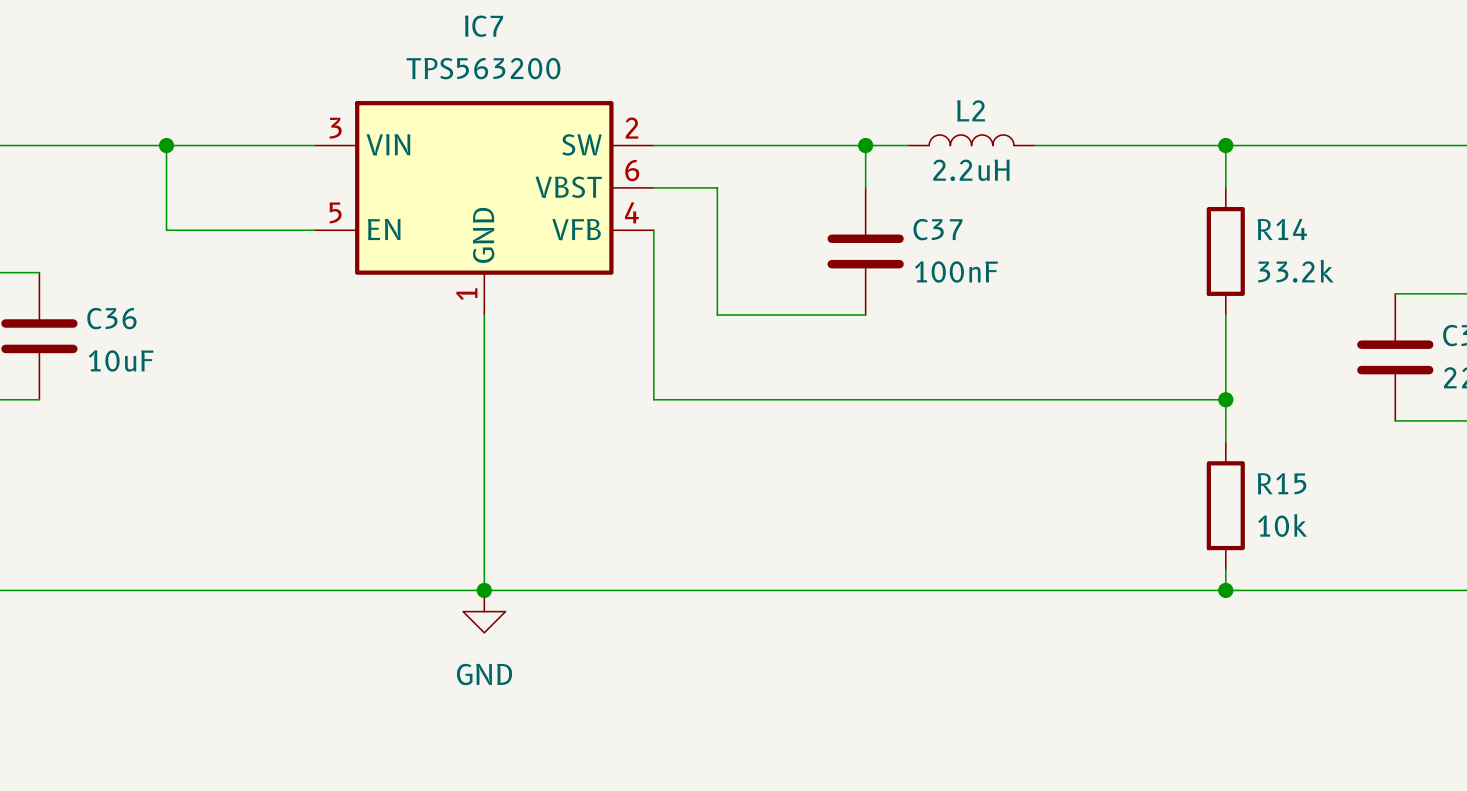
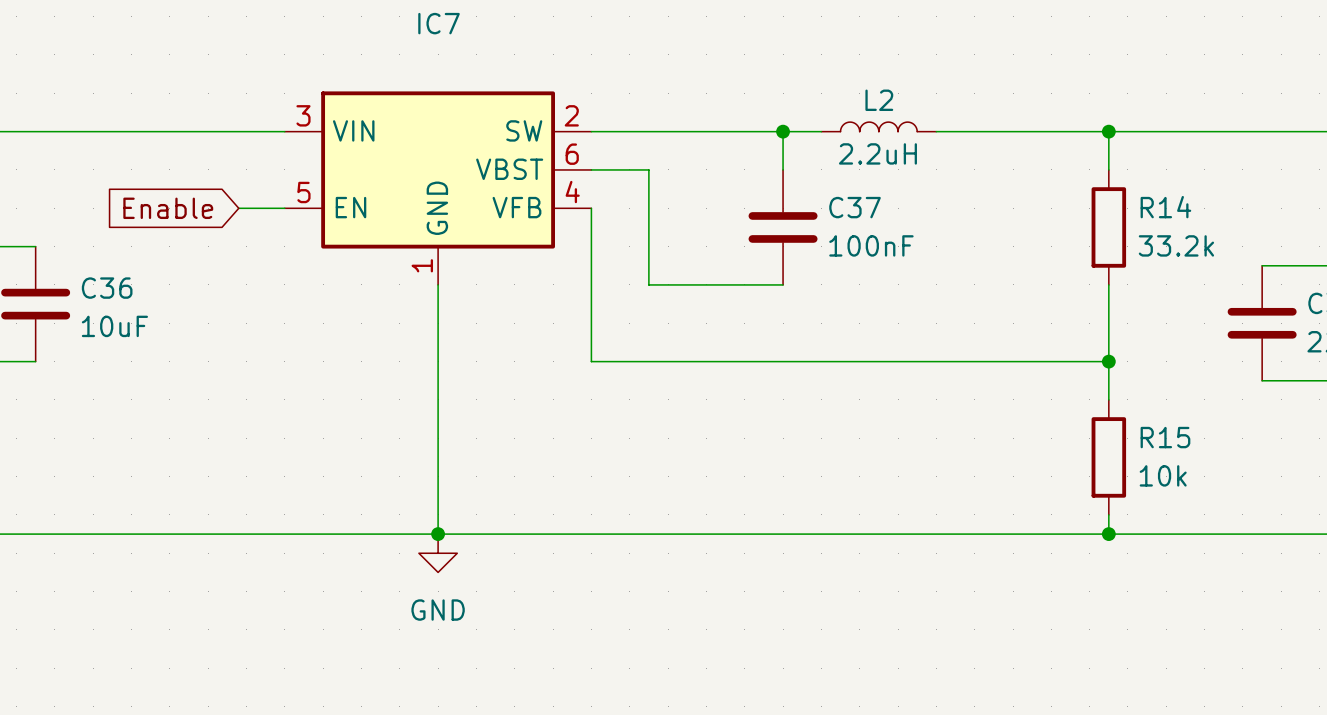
IC7 value: TPS563200 (483, 68) -> none
wire: (166, 145) (166, 230) (263, 230) -> none
junction: (166, 145) -> none
global label: none -> Enable (168, 208)

